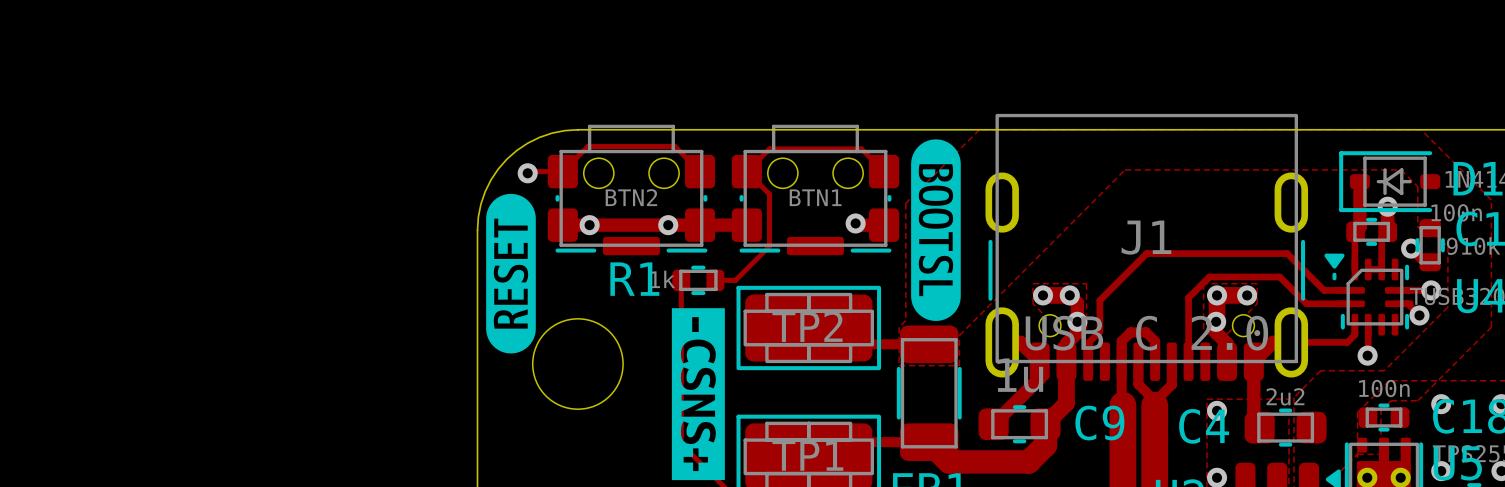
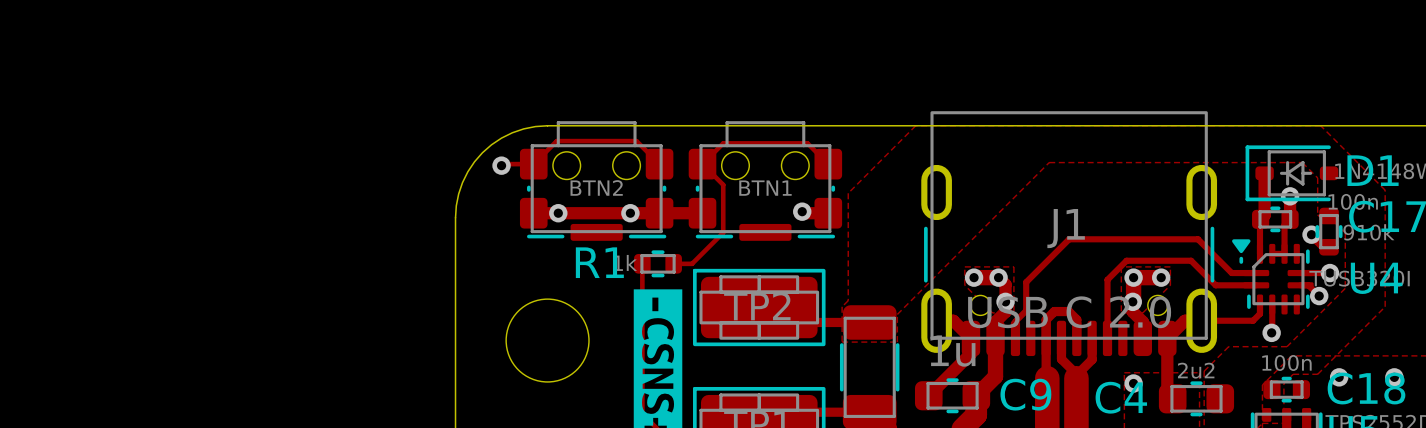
drawing: [911, 139, 961, 321] -> none
drawing: [486, 193, 536, 354] -> none

